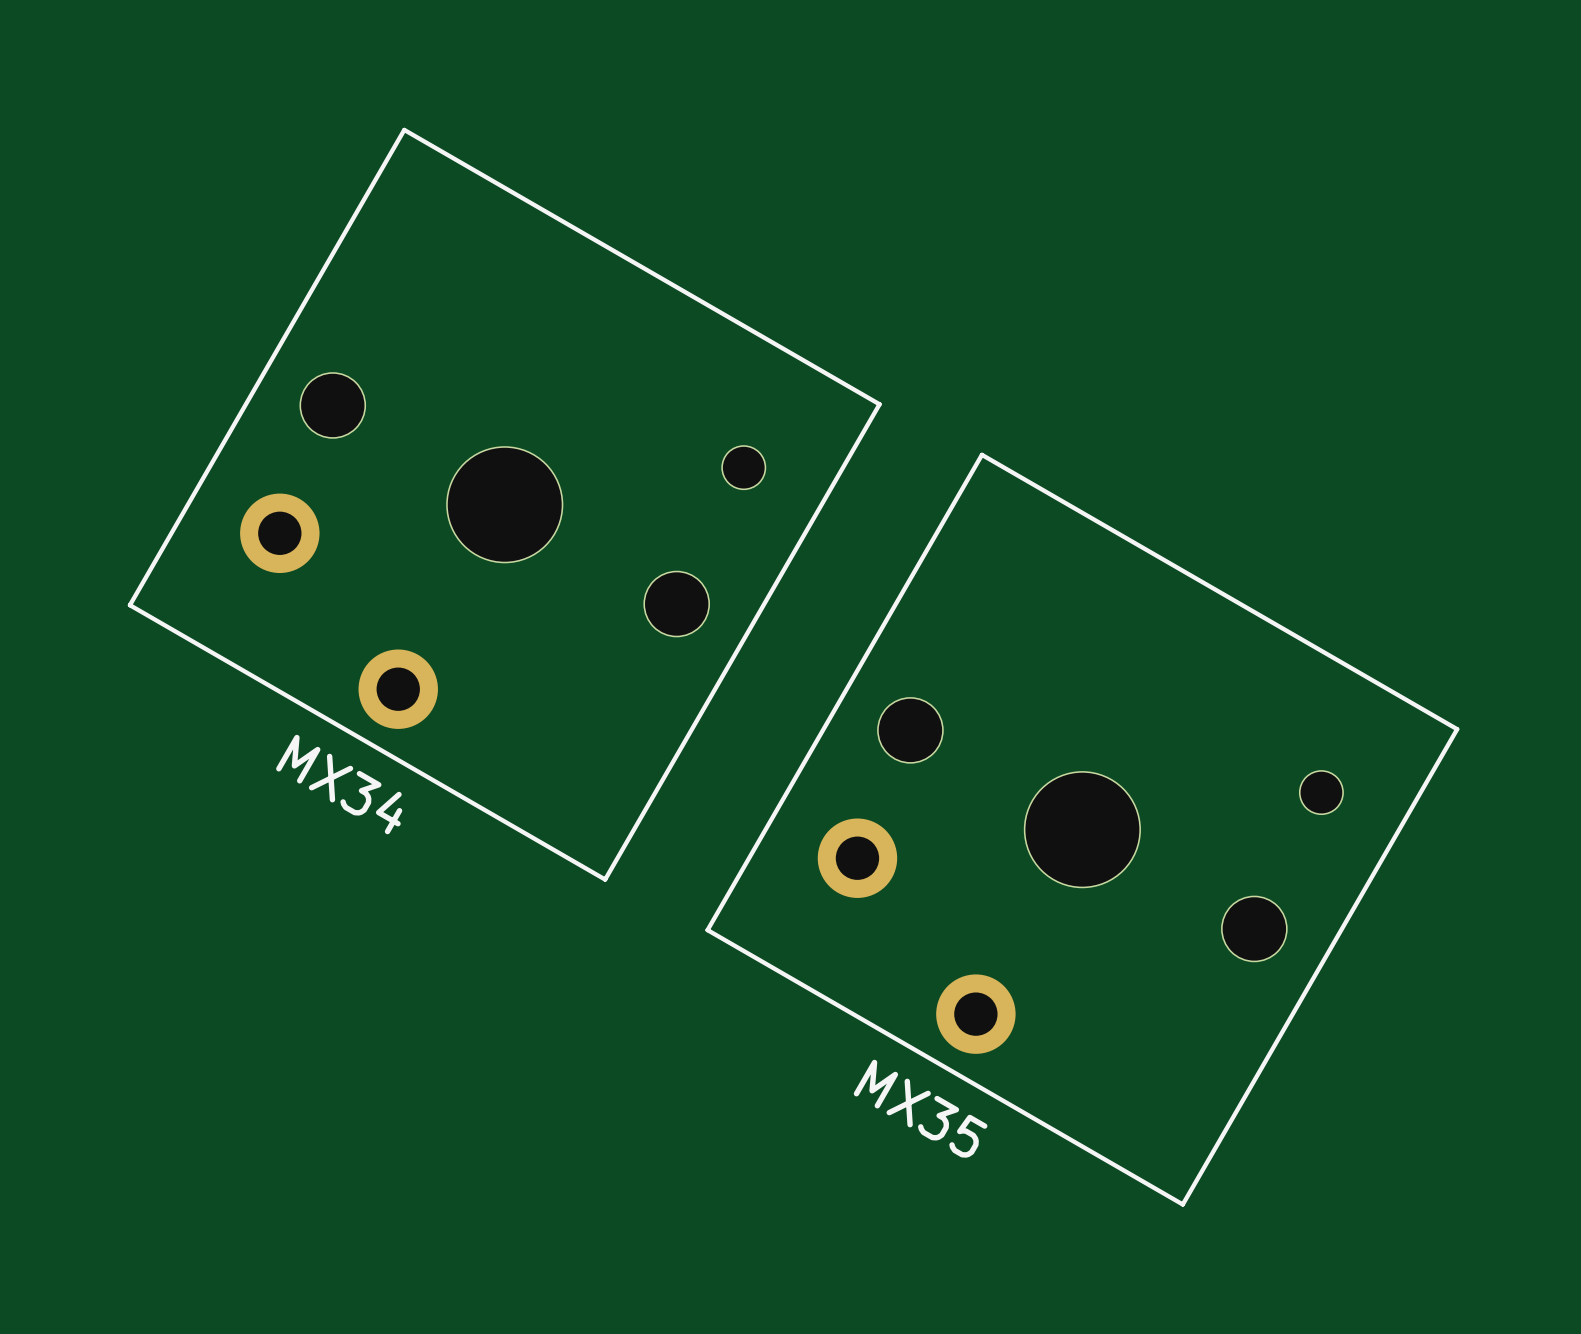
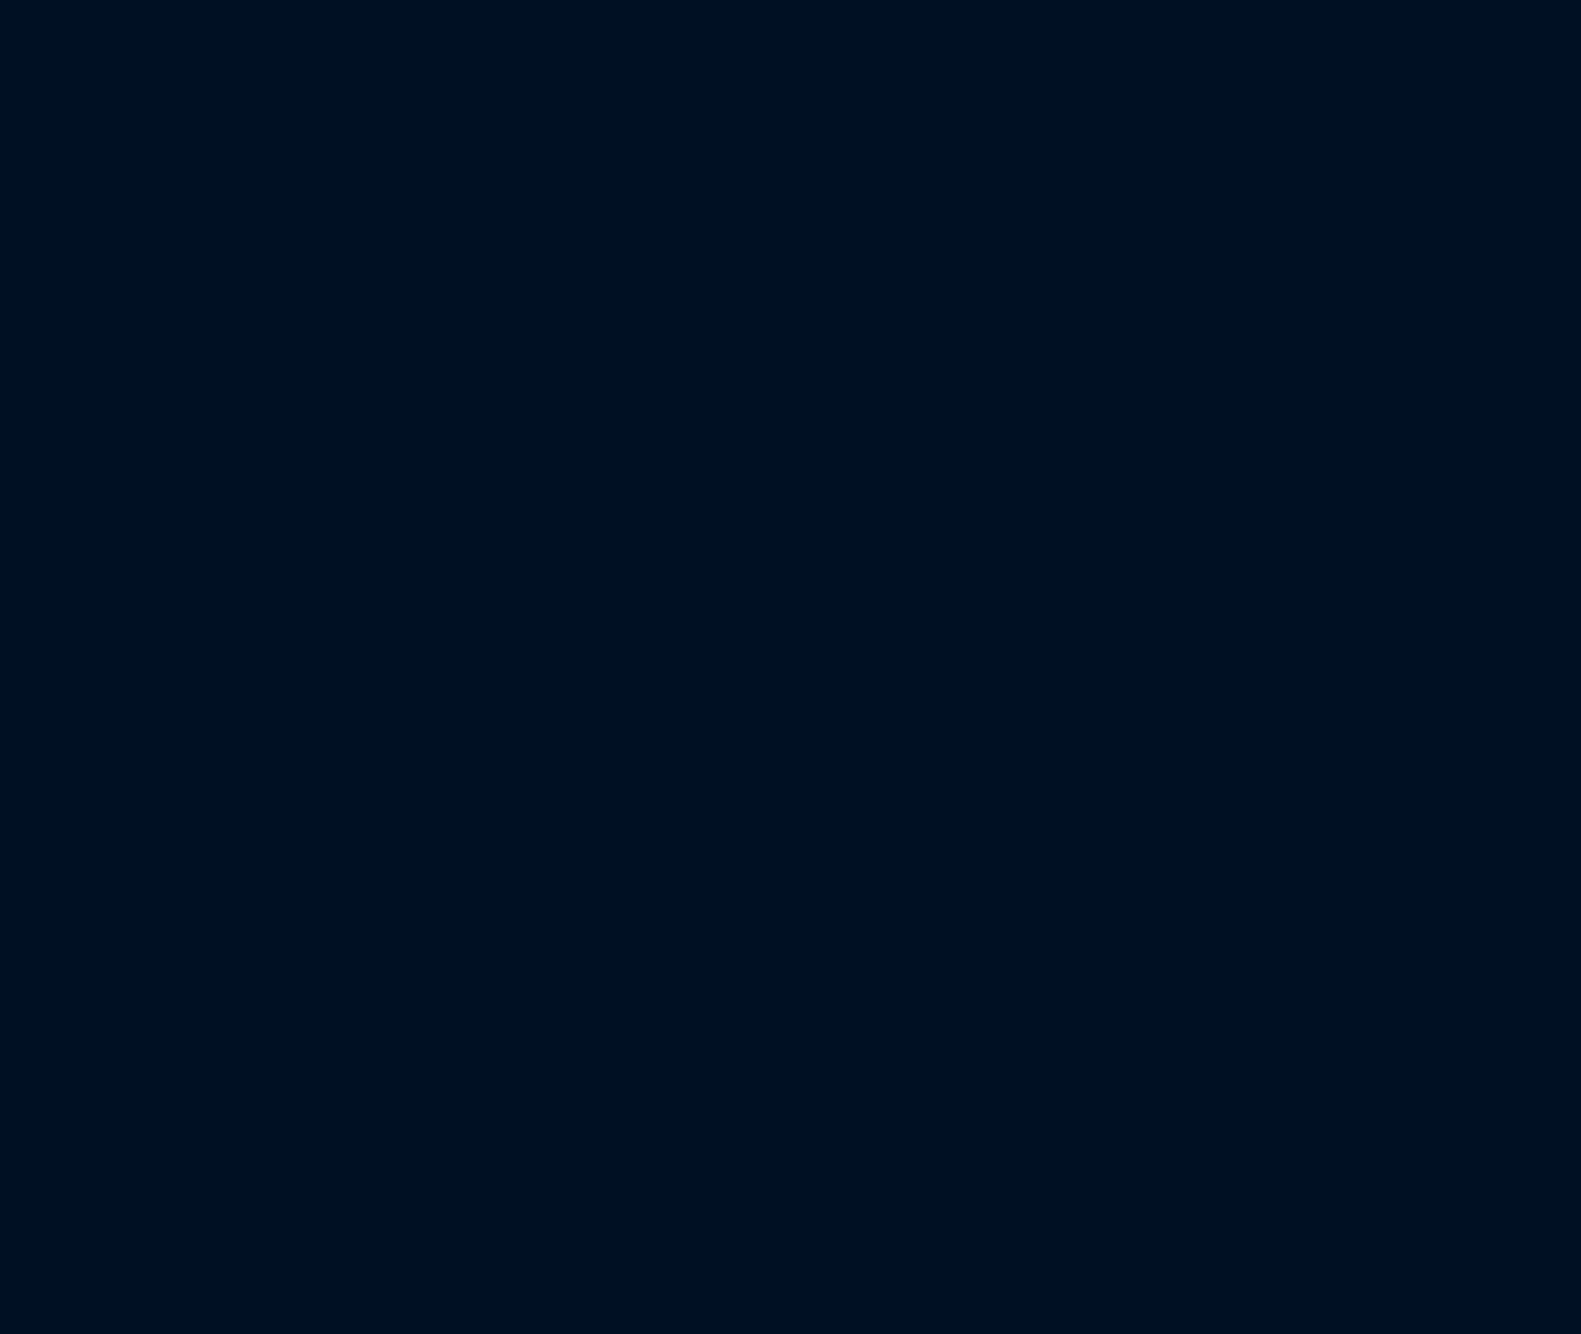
MX34: (504, 504) -> none
MX35: (1082, 829) -> none

